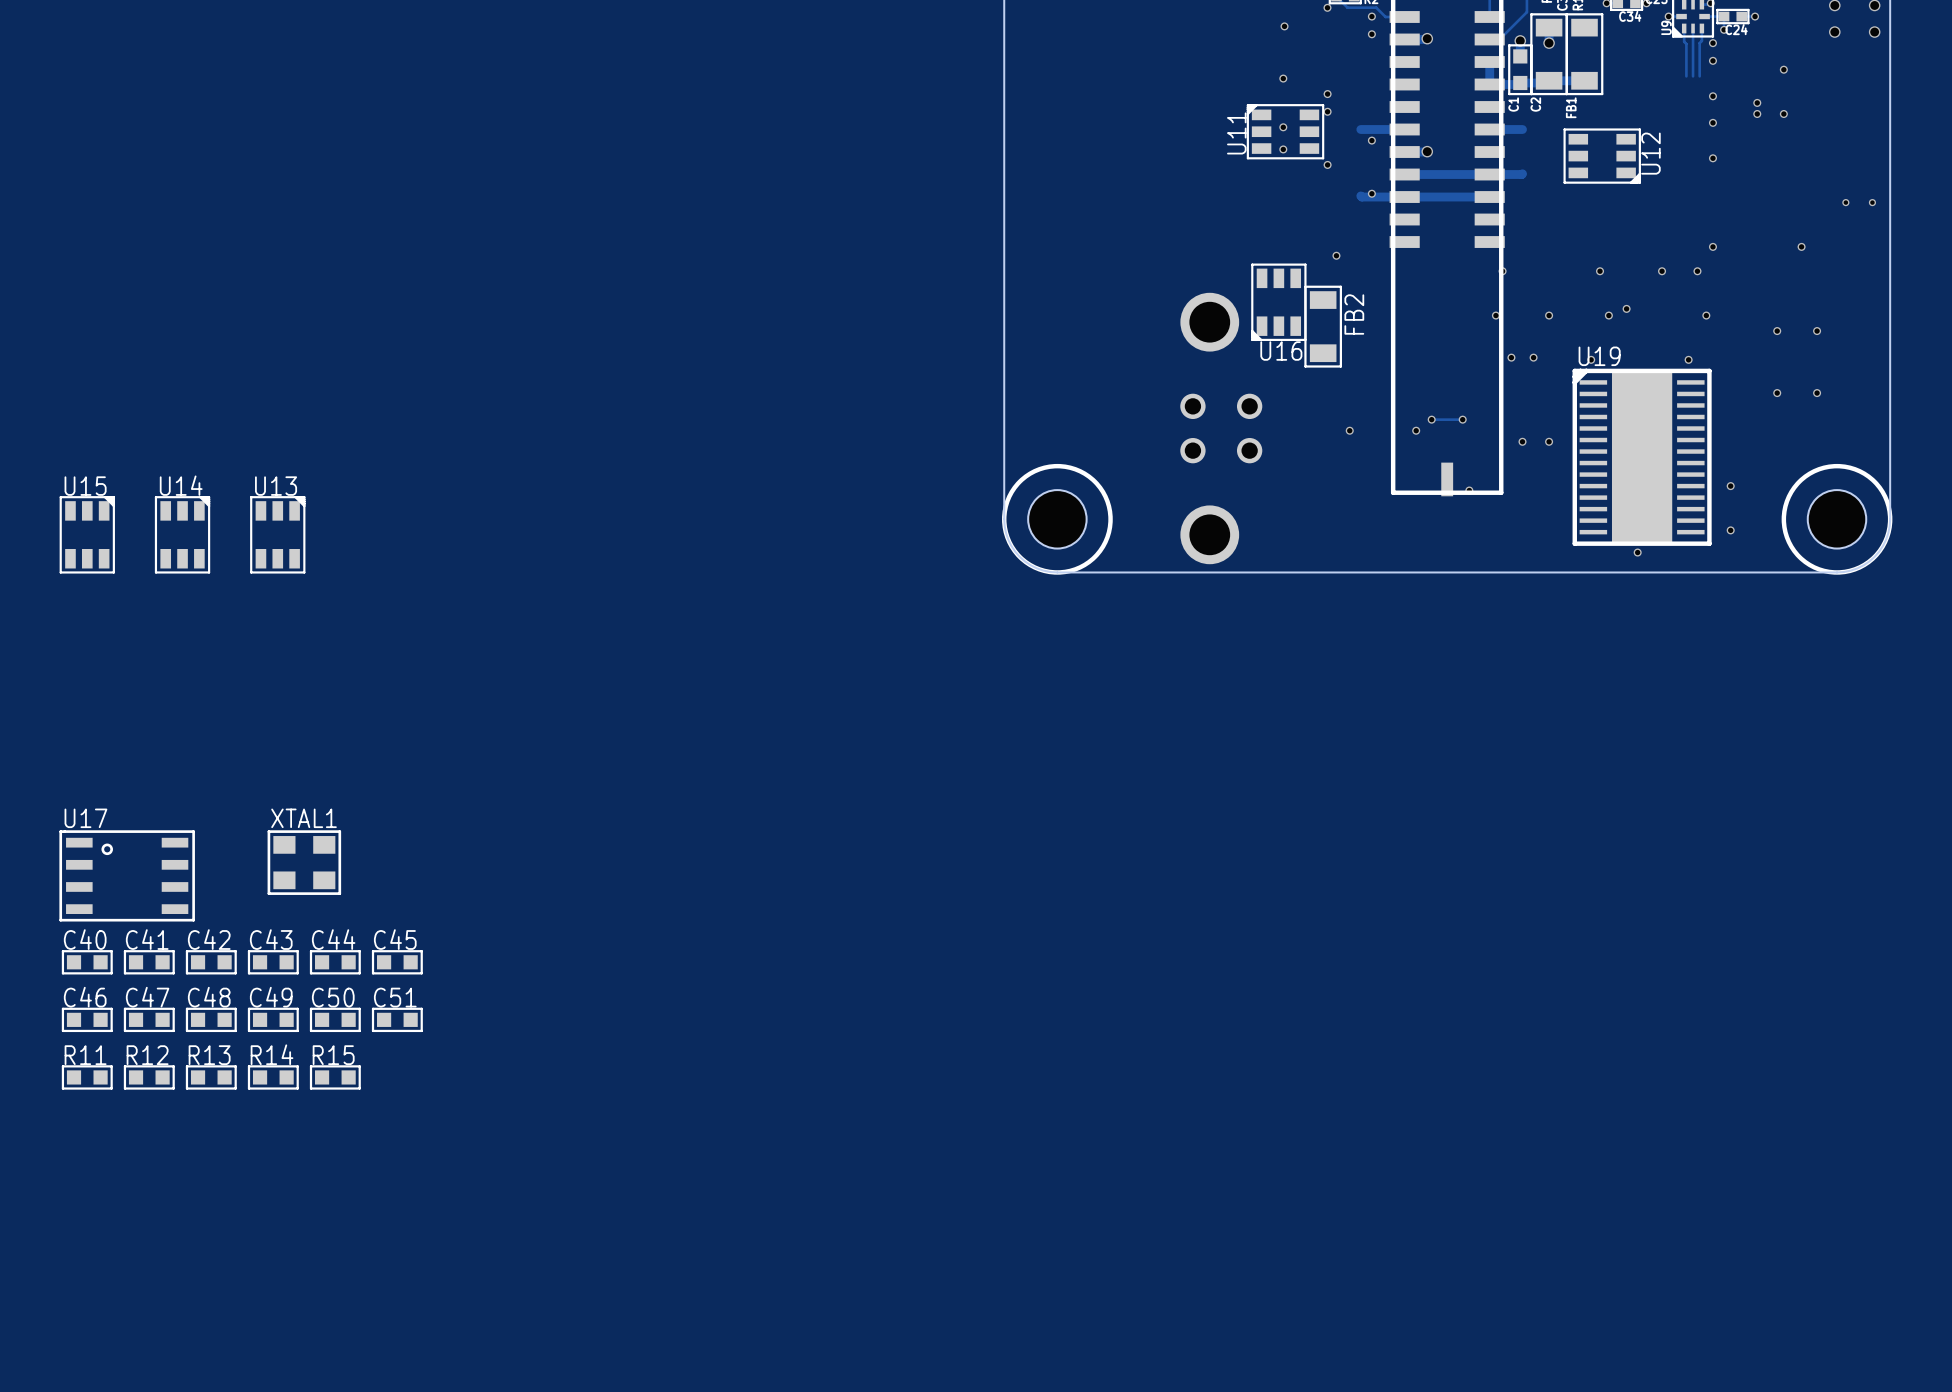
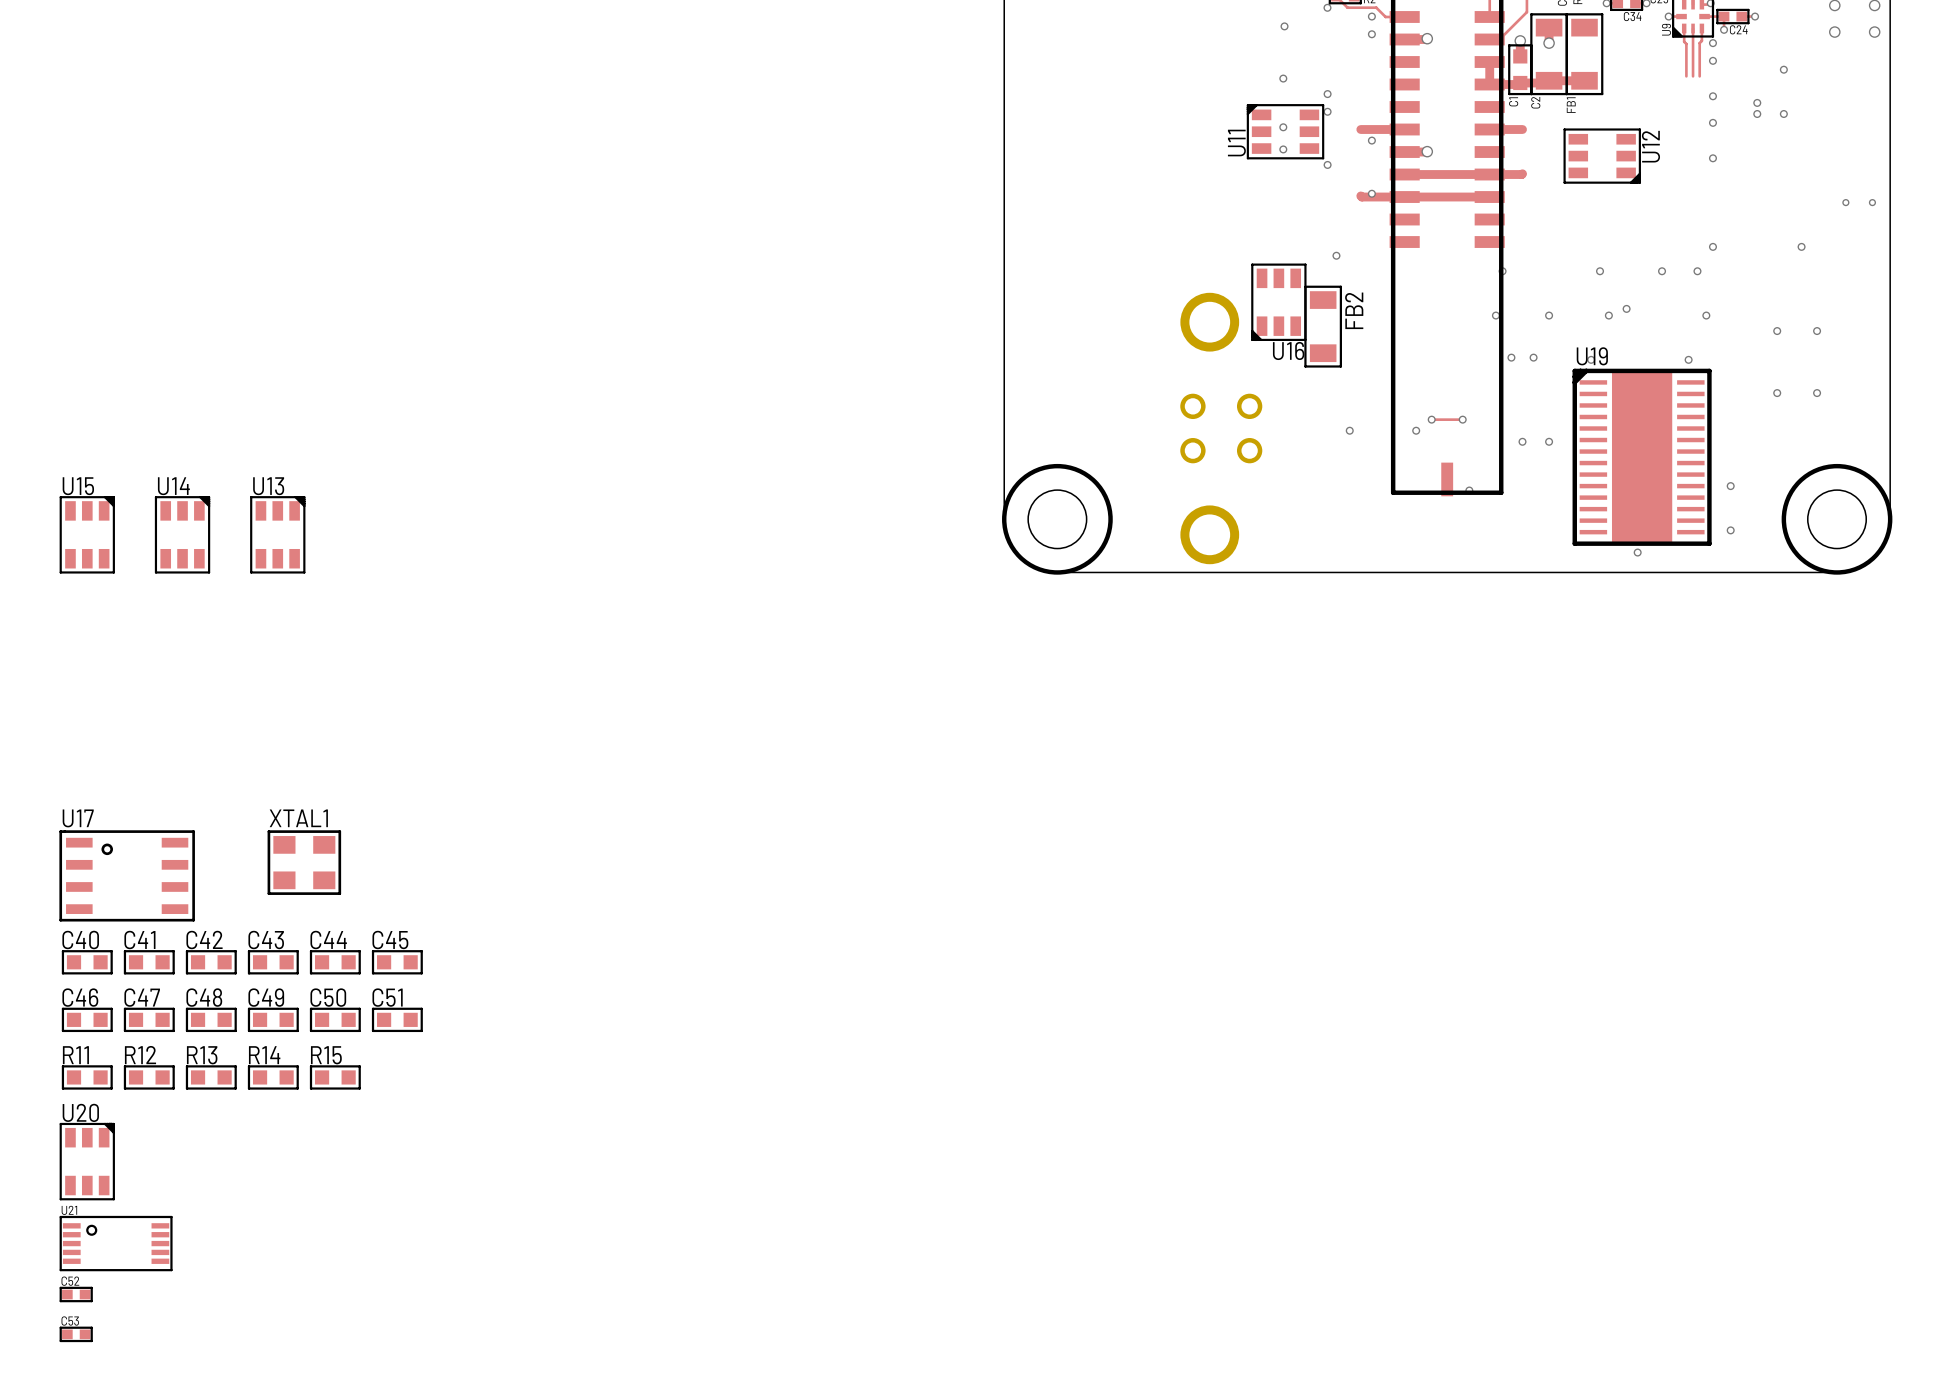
U20: none -> (87, 1161)
U21: none -> (116, 1243)
C52: none -> (76, 1294)
C53: none -> (76, 1334)

